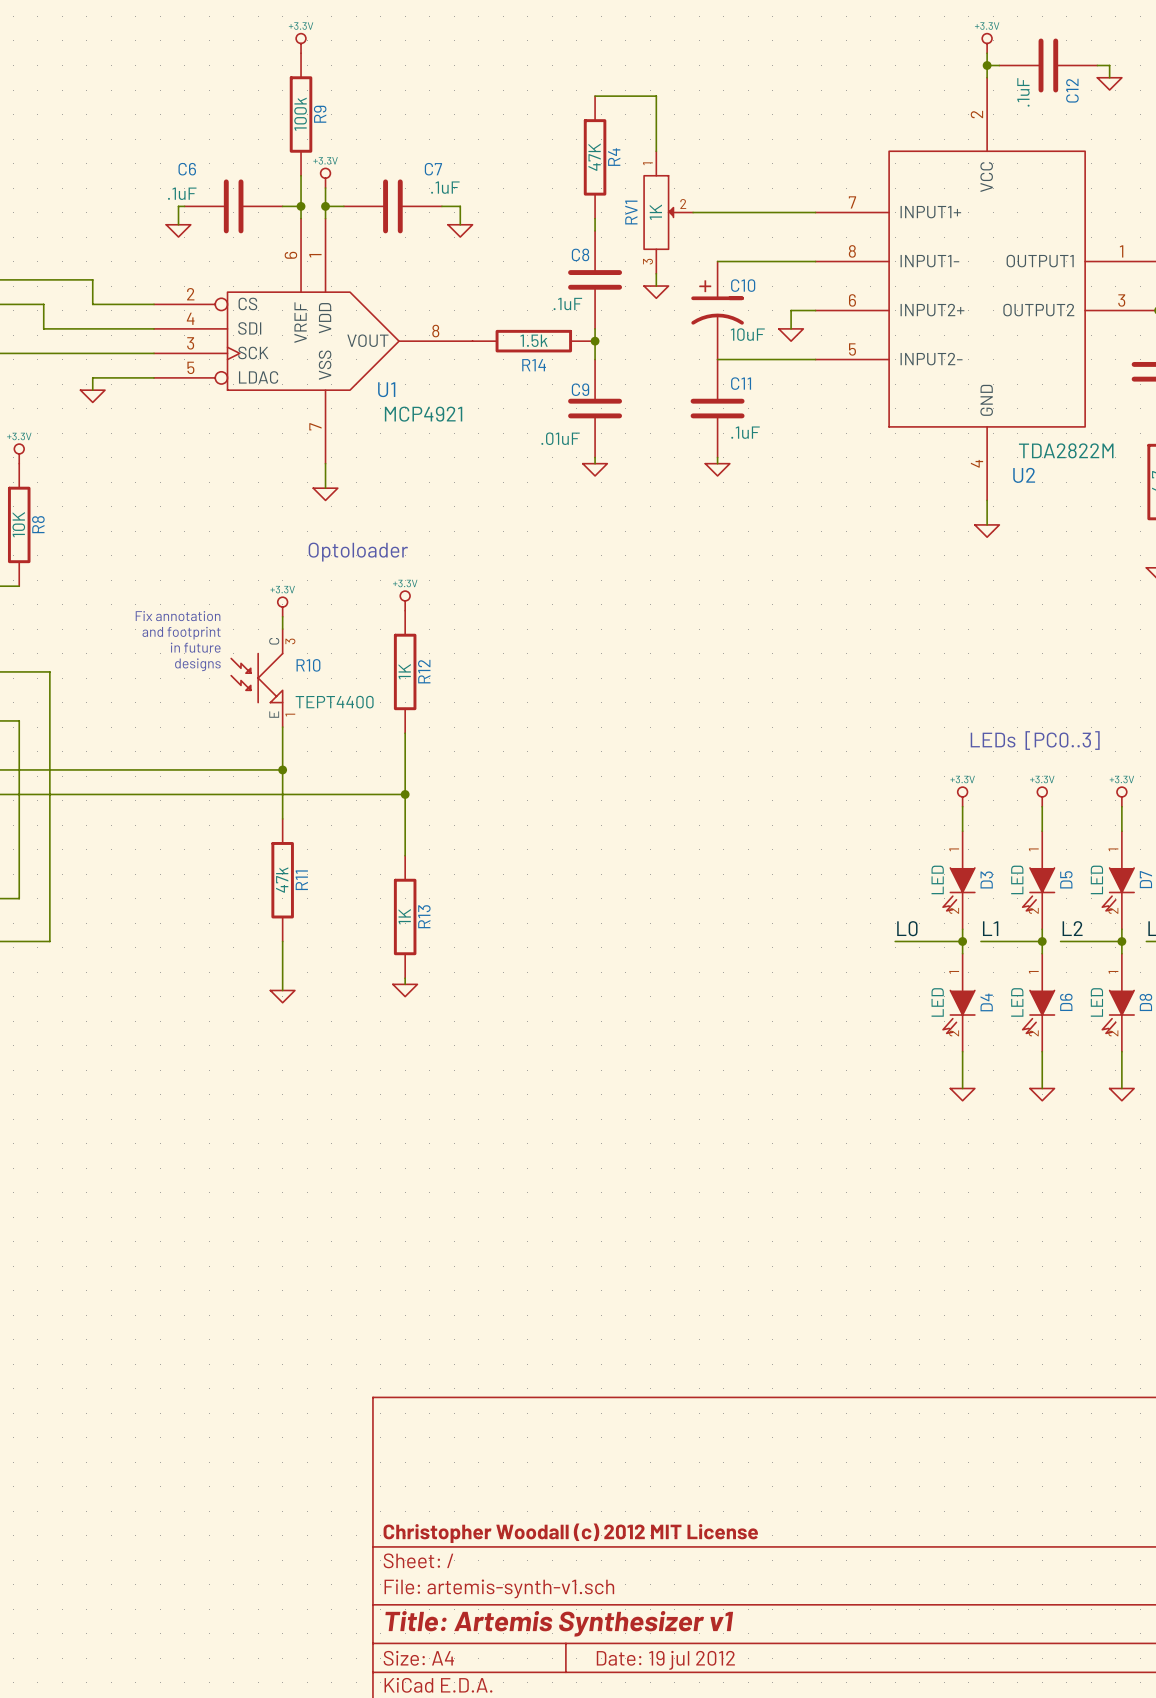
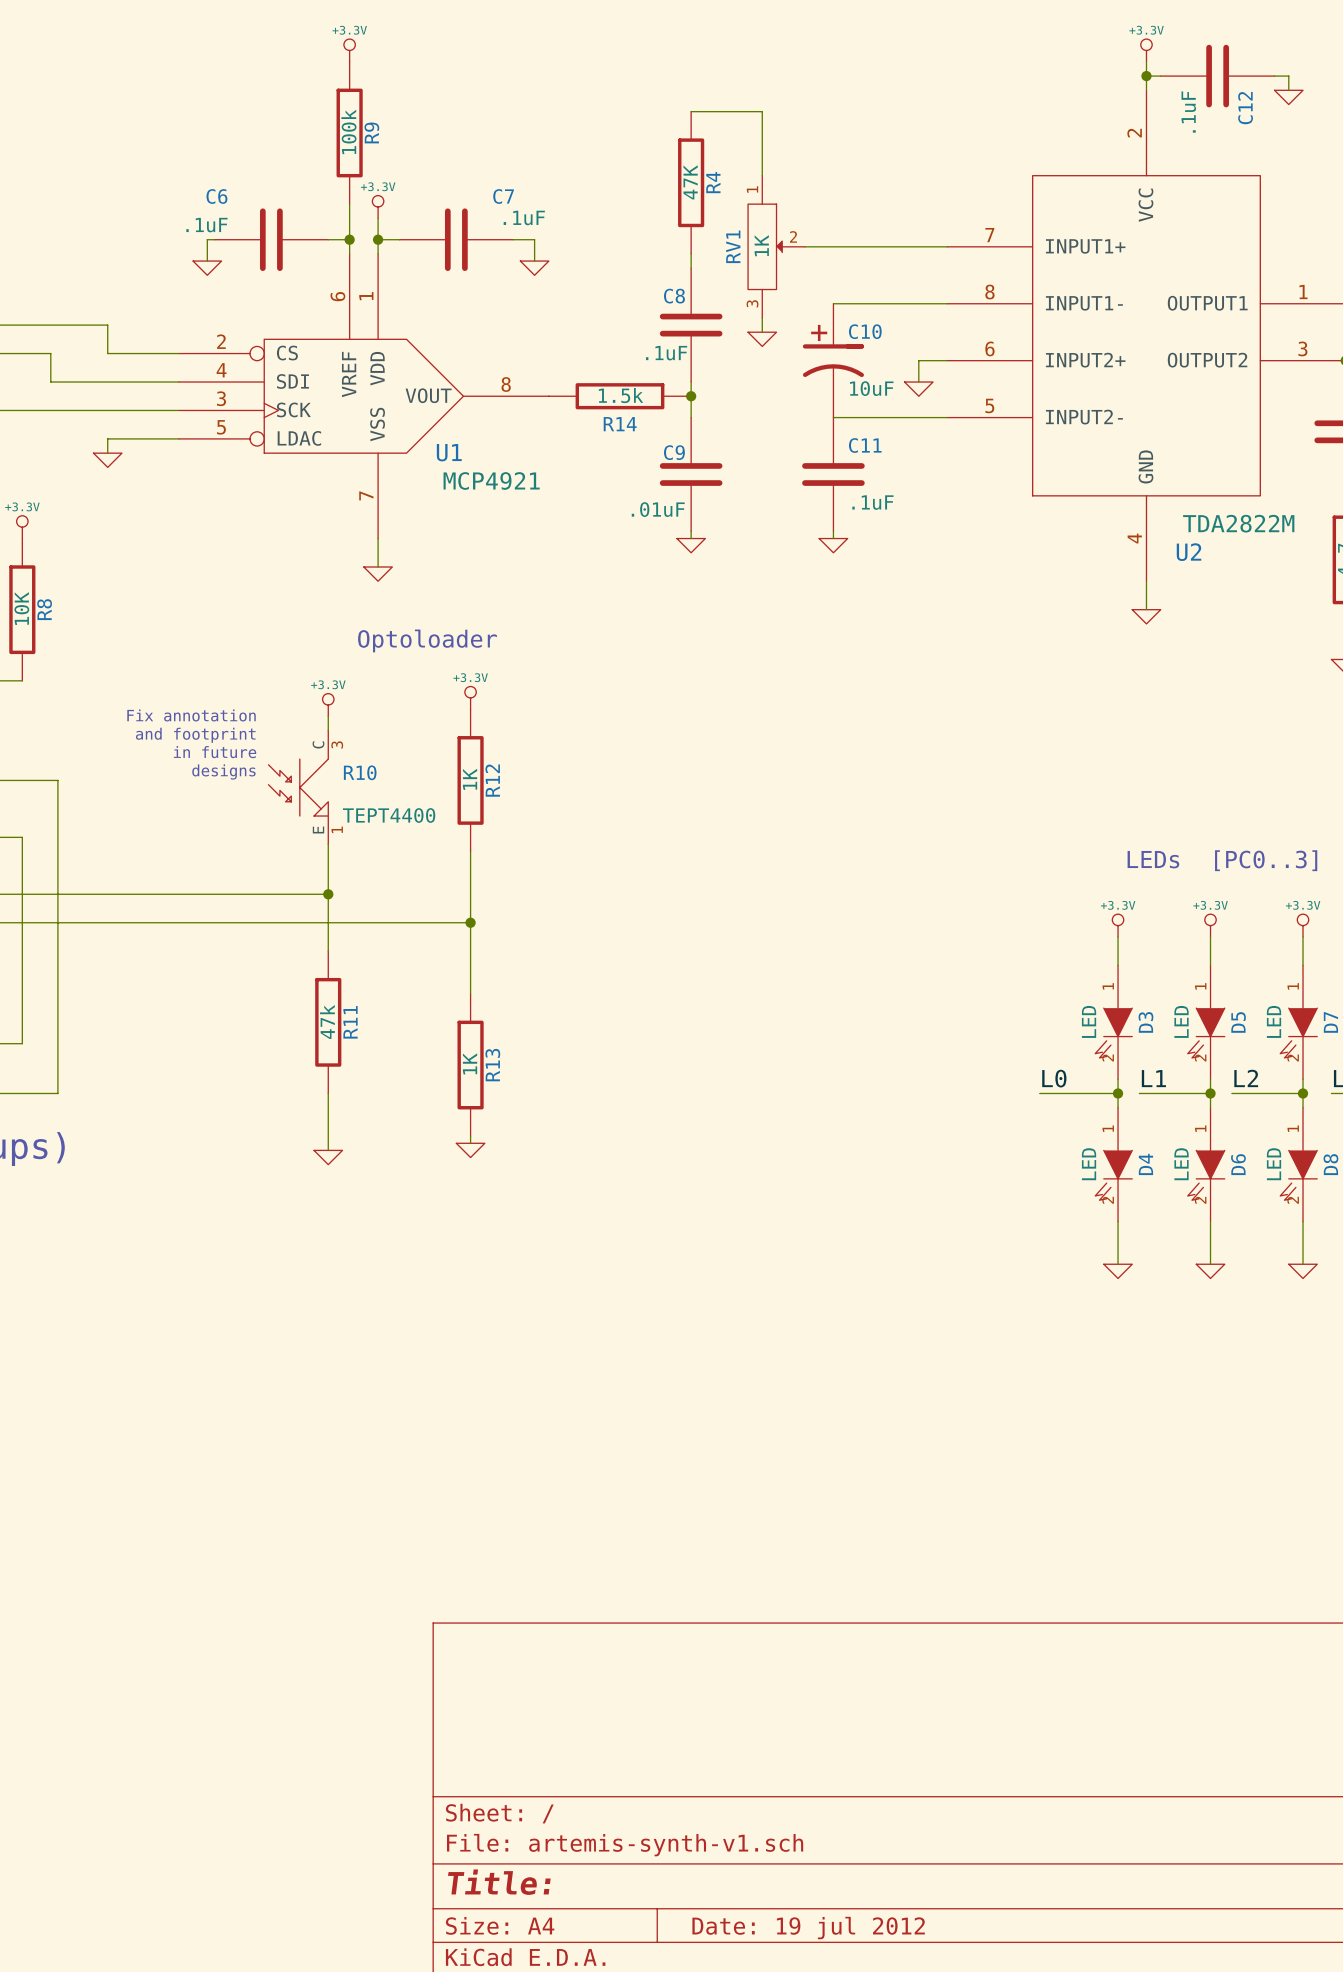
title block: Christopher Woodall (c) 2012 MIT License (570, 1533) -> none
title block: Title: Artemis Synthesizer v1 (559, 1623) -> Title: (499, 1882)

